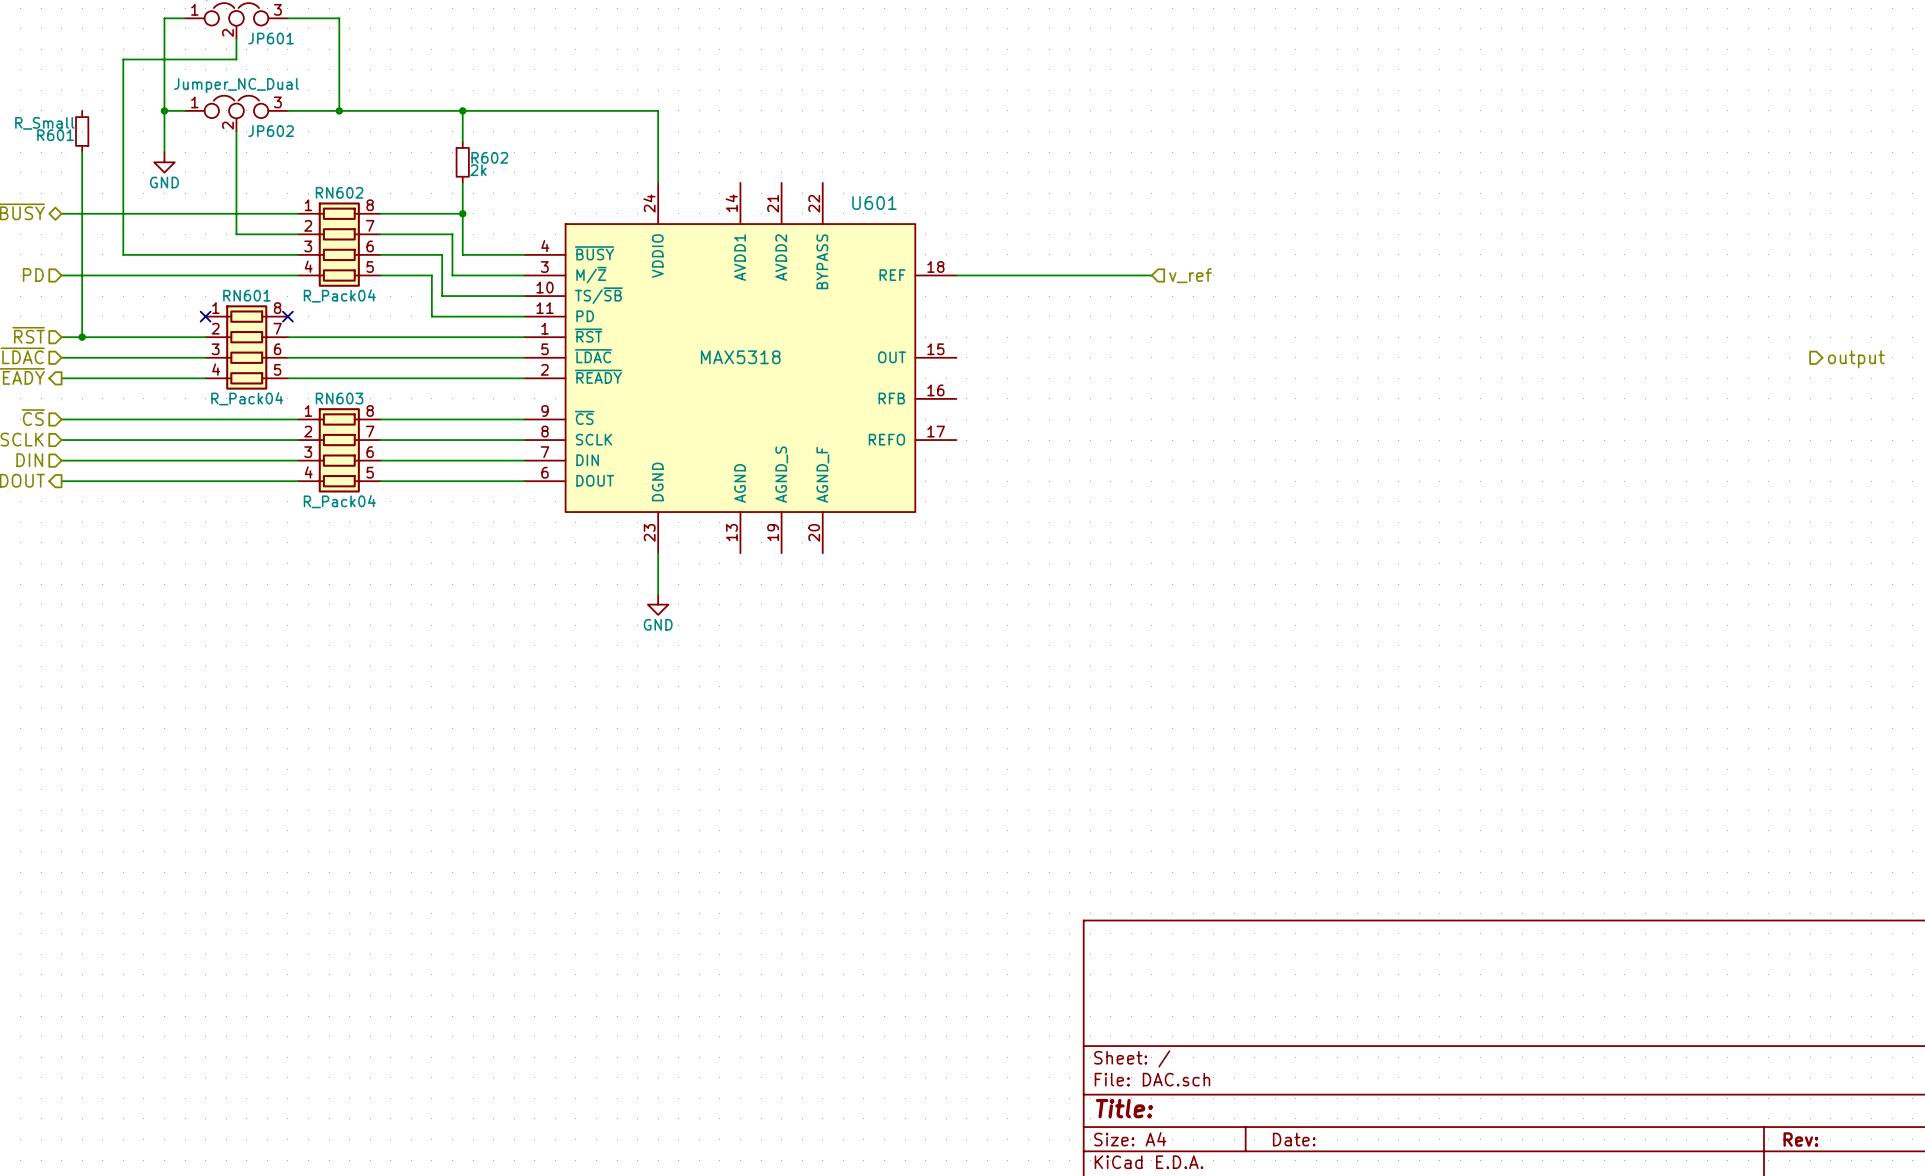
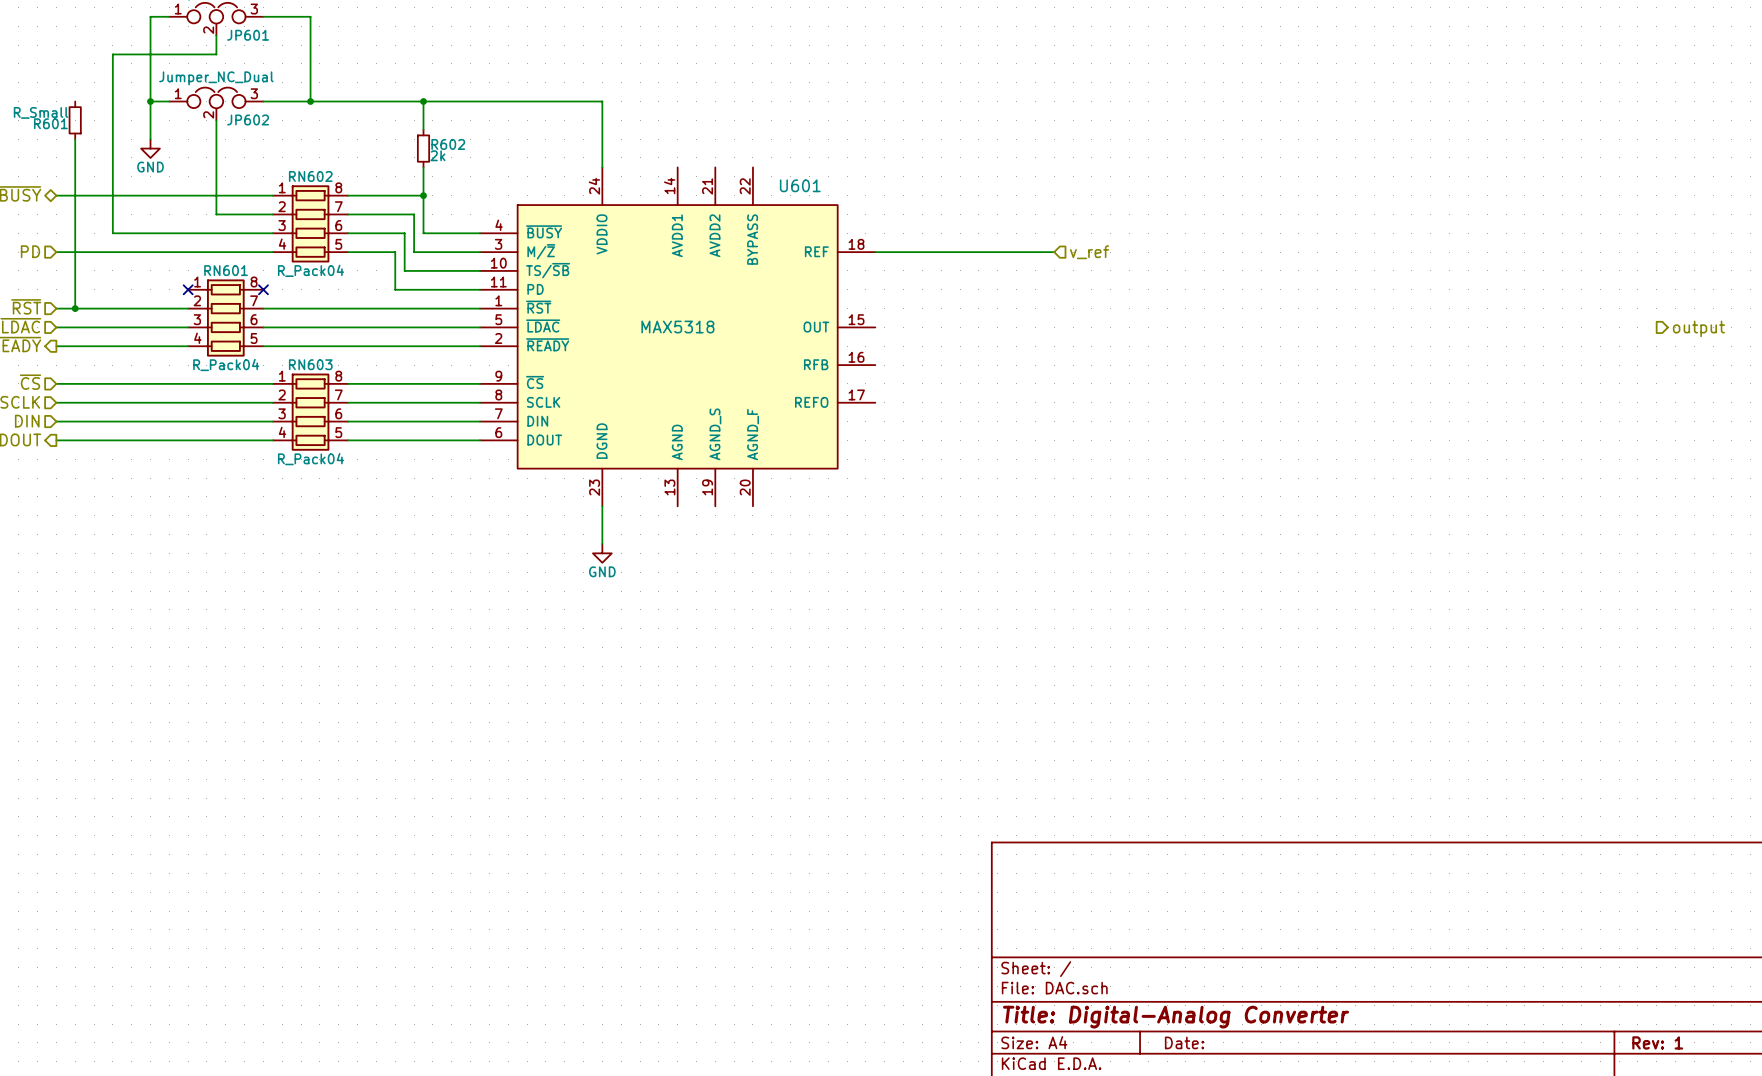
title block: Title: (1124, 1108) -> Title: Digital-Analog Converter (1176, 1017)
title block: Rev: (1800, 1139) -> Rev: 1 (1657, 1042)

